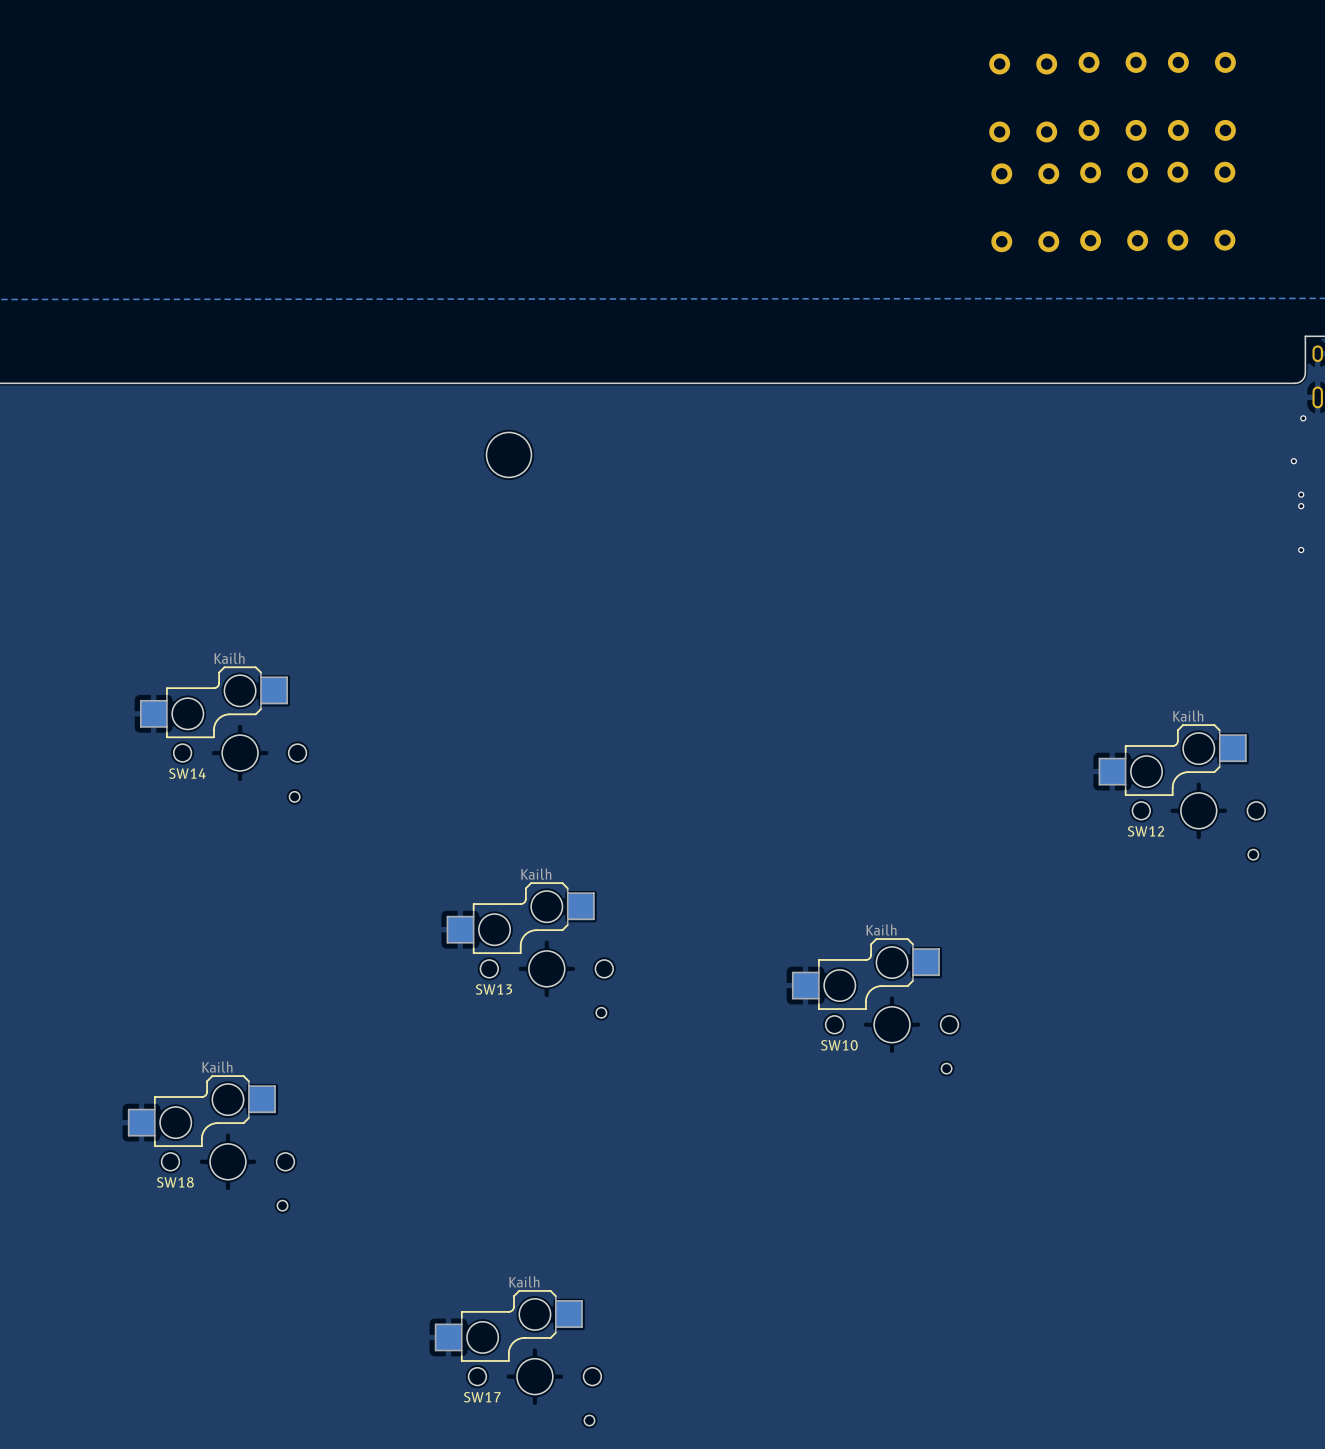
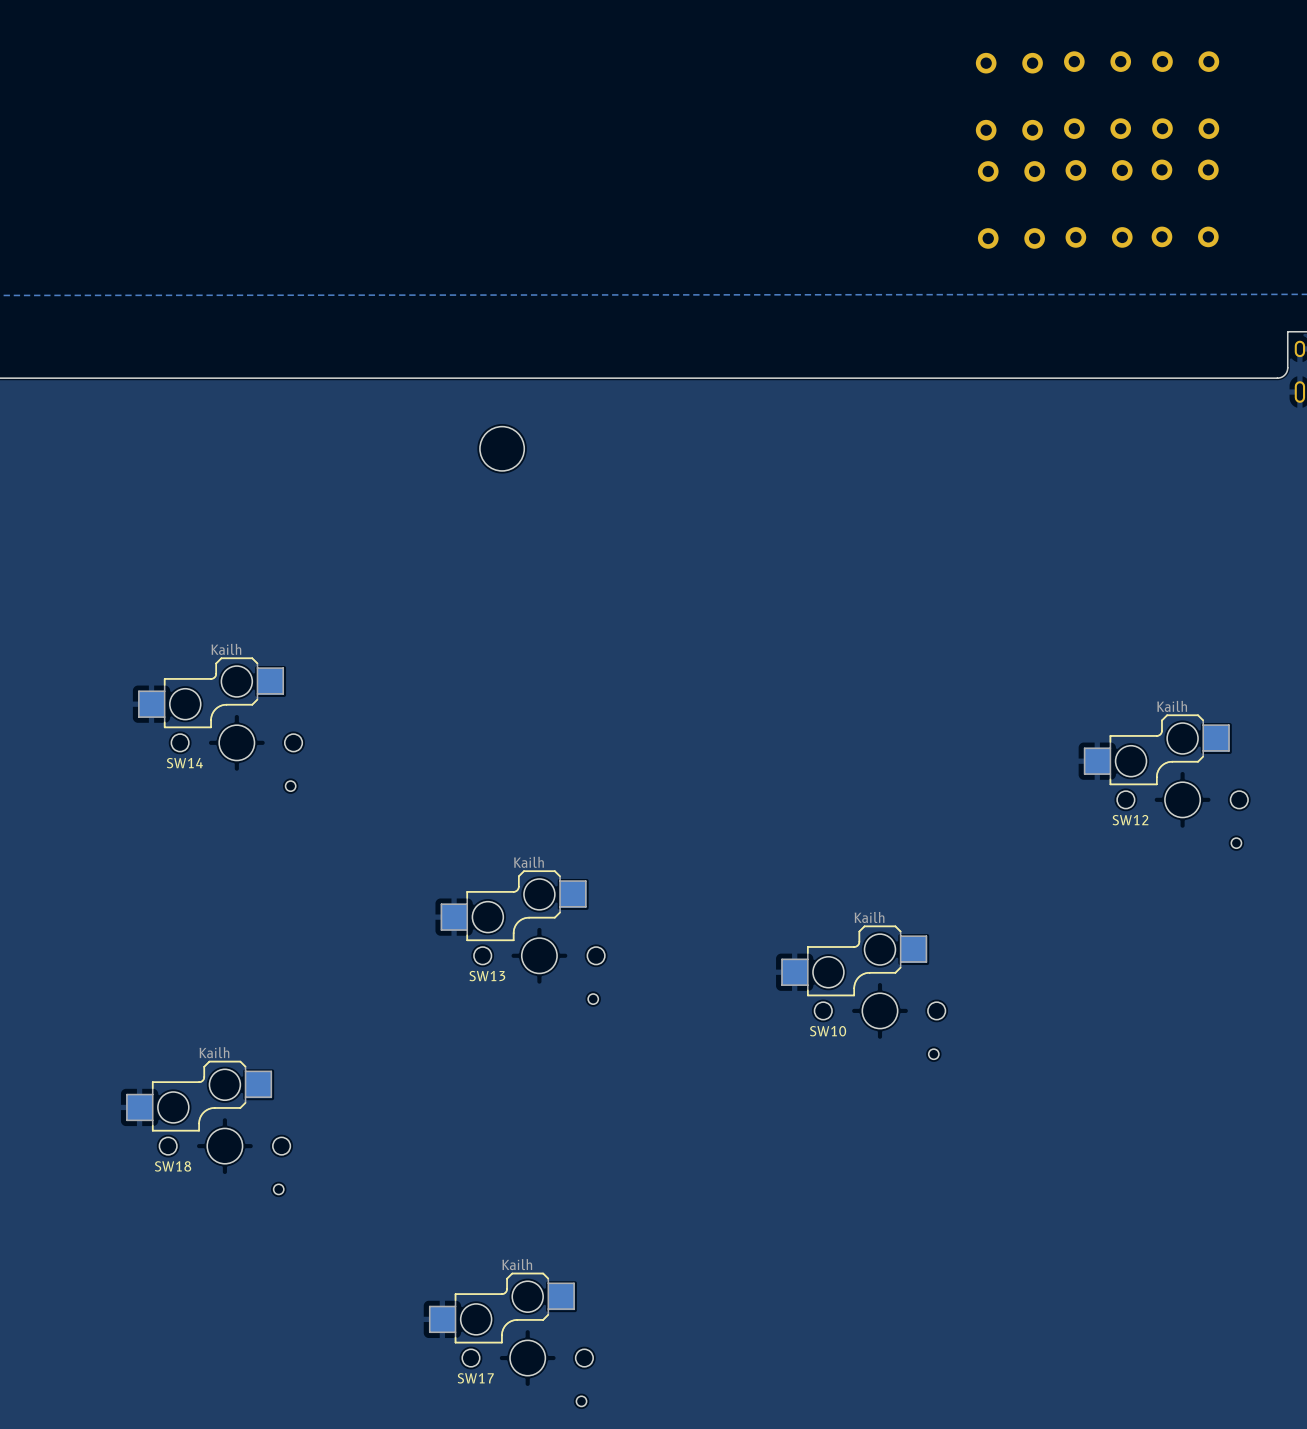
via: (1303, 418) -> none
via: (1293, 461) -> none
via: (1301, 494) -> none
via: (1301, 506) -> none
via: (1301, 550) -> none

